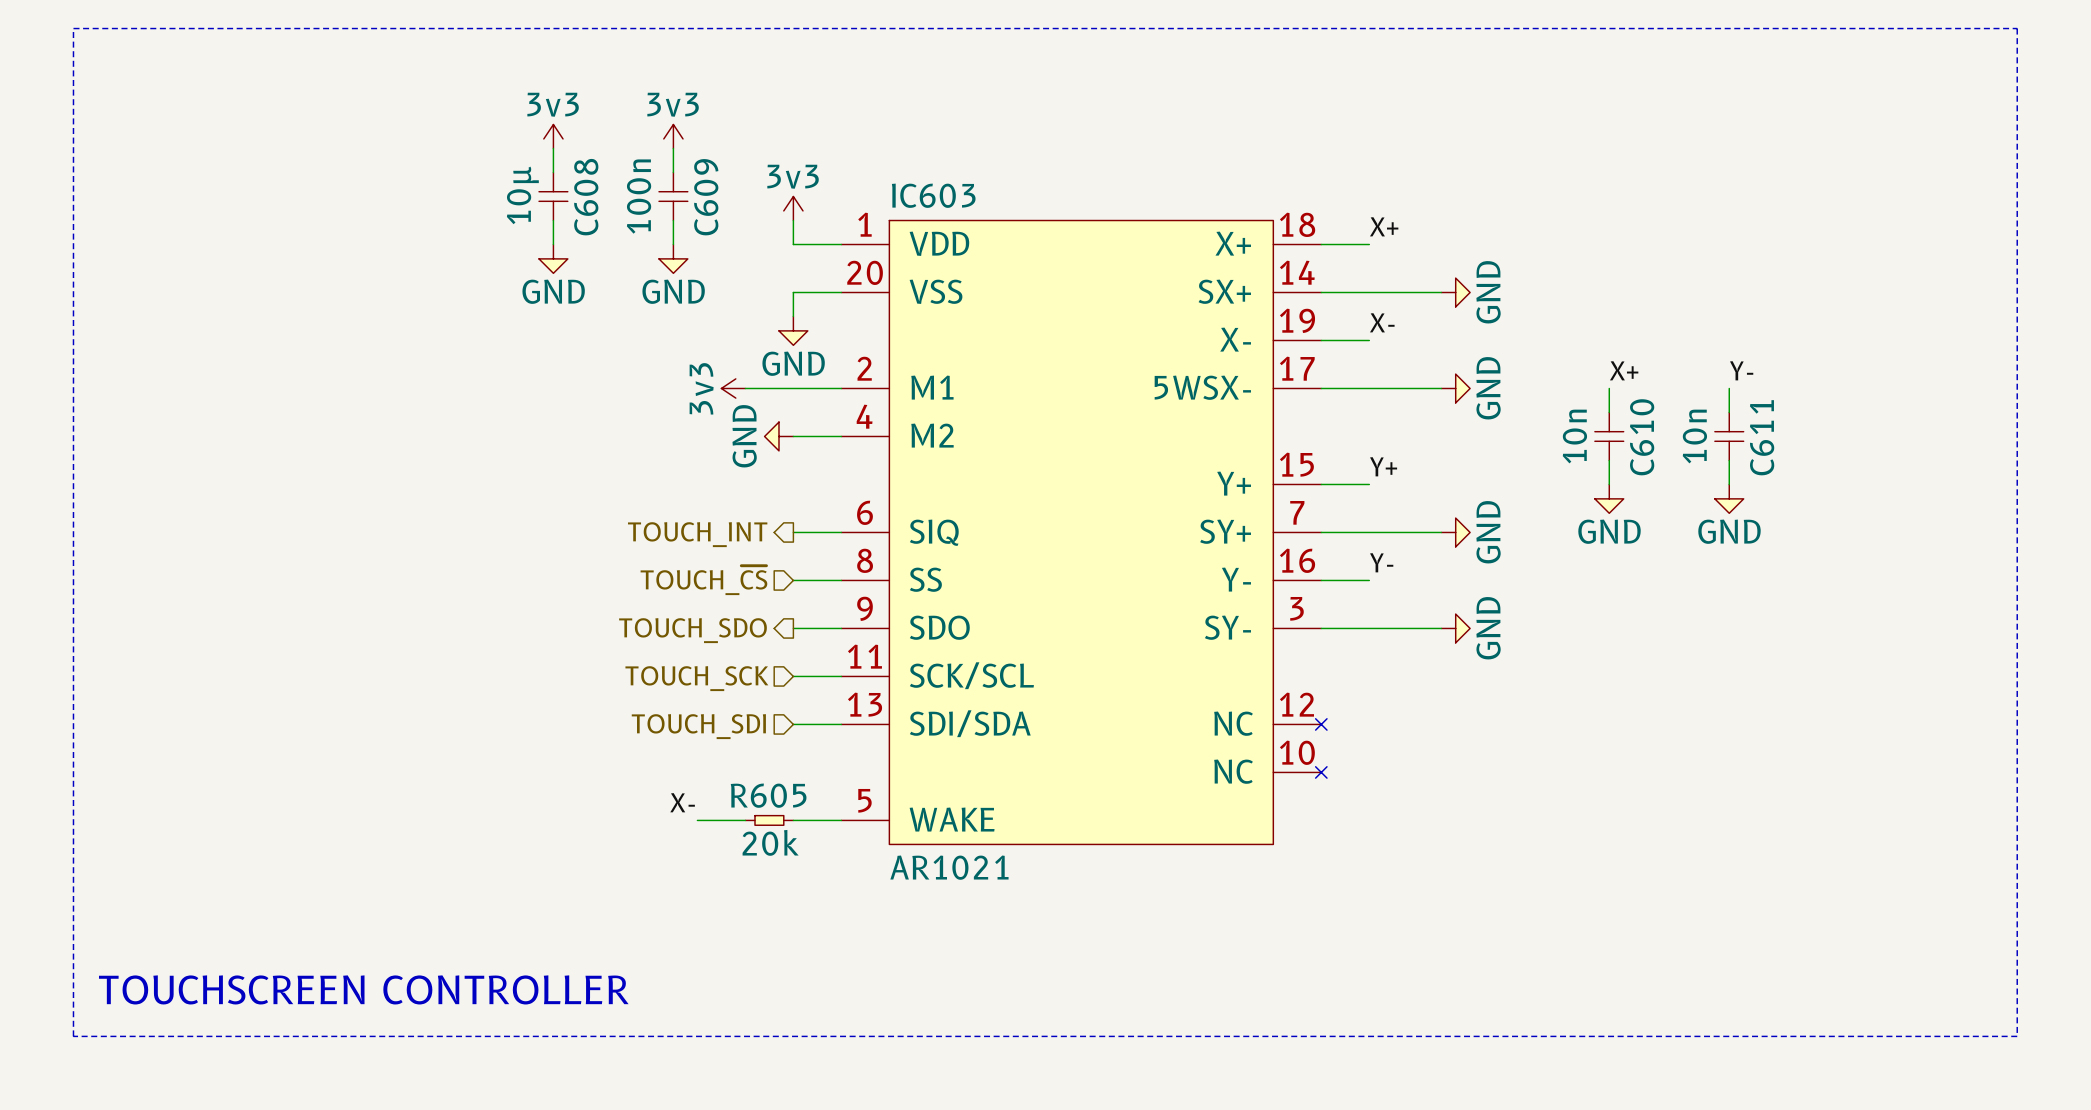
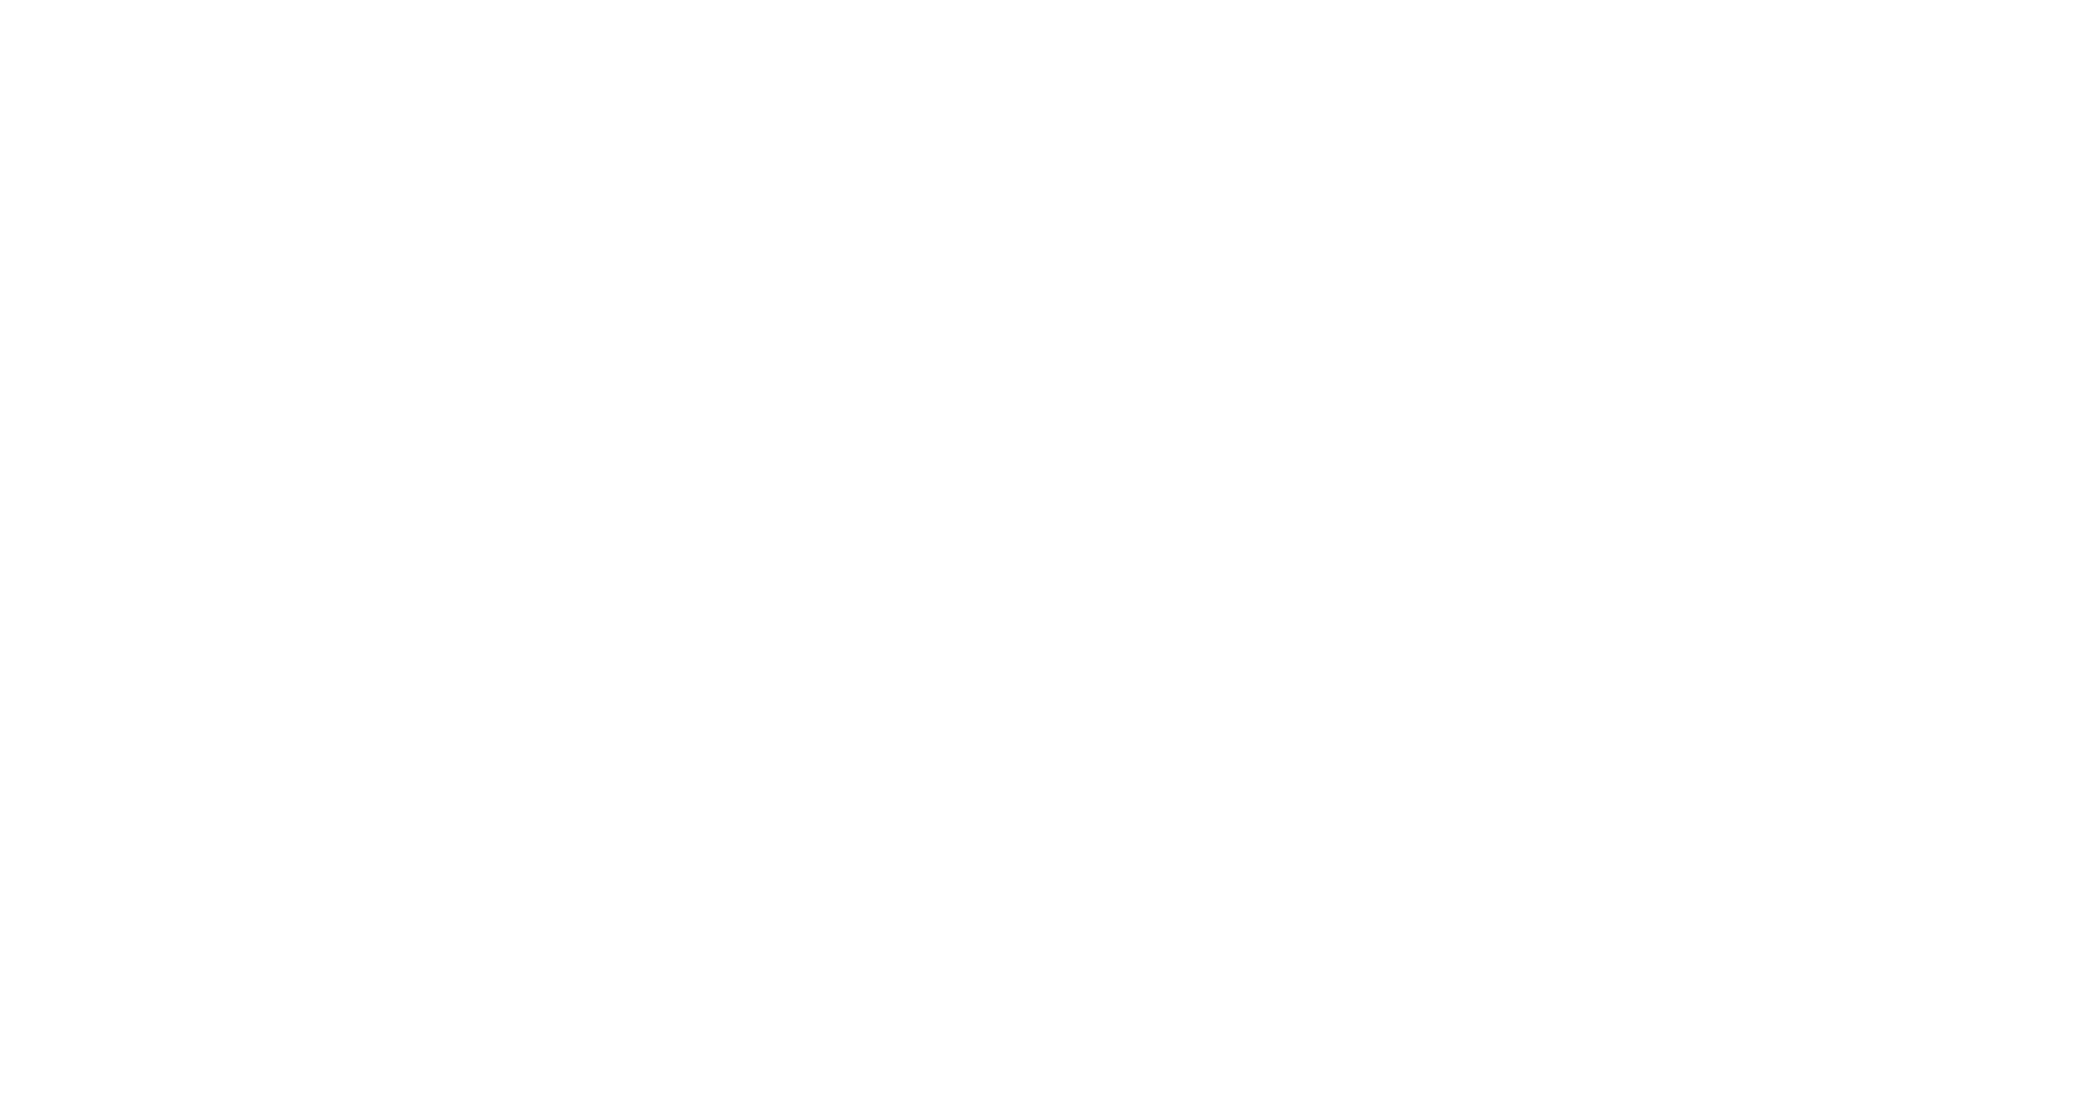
line: (73, 28) (2017, 28) (2017, 1036) (73, 1036) (73, 28) -> none
power symbol: 3v3 (553, 136) -> none
power symbol: 3v3 (673, 136) -> none
wire: (553, 148) (553, 172) -> none
wire: (673, 148) (673, 172) -> none
C608: 10µ (553, 196) -> none
C609: 100n (673, 196) -> none
power symbol: 3v3 (793, 208) -> none
wire: (553, 220) (553, 244) -> none
wire: (673, 220) (673, 244) -> none
wire: (793, 220) (793, 244) (841, 244) -> none
label: X+ (1384, 226) -> none
wire: (1321, 244) (1369, 244) -> none
power symbol: GND (553, 258) -> none
power symbol: GND (673, 258) -> none
wire: (841, 292) (793, 292) (793, 316) -> none
wire: (1321, 292) (1441, 292) -> none
power symbol: GND (1455, 292) -> none
label: X- (1382, 322) -> none
power symbol: GND (793, 330) -> none
wire: (1321, 340) (1369, 340) -> none
label: X+ (1624, 370) -> none
label: Y- (1741, 370) -> none
power symbol: 3v3 (733, 388) -> none
wire: (745, 388) (841, 388) -> none
wire: (1321, 388) (1441, 388) -> none
power symbol: GND (1455, 388) -> none
wire: (1609, 388) (1609, 412) -> none
wire: (1729, 388) (1729, 412) -> none
power symbol: GND (778, 436) -> none
wire: (793, 436) (841, 436) -> none
C610: 10n (1609, 436) -> none
C611: 10n (1729, 436) -> none
wire: (1609, 460) (1609, 484) -> none
wire: (1729, 460) (1729, 484) -> none
label: Y+ (1383, 466) -> none
wire: (1321, 484) (1369, 484) -> none
power symbol: GND (1609, 498) -> none
power symbol: GND (1729, 498) -> none
wire: (793, 532) (841, 532) -> none
IC603: AR1021 (1084, 532) -> none
wire: (1321, 532) (1441, 532) -> none
power symbol: GND (1455, 532) -> none
hierarchical label: TOUCH_INT (697, 534) -> none
label: Y- (1381, 562) -> none
hierarchical label: TOUCH_~{CS} (703, 580) -> none
wire: (793, 580) (841, 580) -> none
wire: (1321, 580) (1369, 580) -> none
wire: (793, 628) (841, 628) -> none
wire: (1321, 628) (1441, 628) -> none
power symbol: GND (1455, 628) -> none
hierarchical label: TOUCH_SDO (693, 630) -> none
wire: (793, 676) (841, 676) -> none
hierarchical label: TOUCH_SCK (696, 678) -> none
wire: (793, 724) (841, 724) -> none
hierarchical label: TOUCH_SDI (698, 726) -> none
label: X- (682, 802) -> none
wire: (697, 820) (745, 820) -> none
R605: 20k (769, 820) -> none
wire: (793, 820) (841, 820) -> none
text: TOUCHSCREEN CONTROLLER (363, 989) -> none

